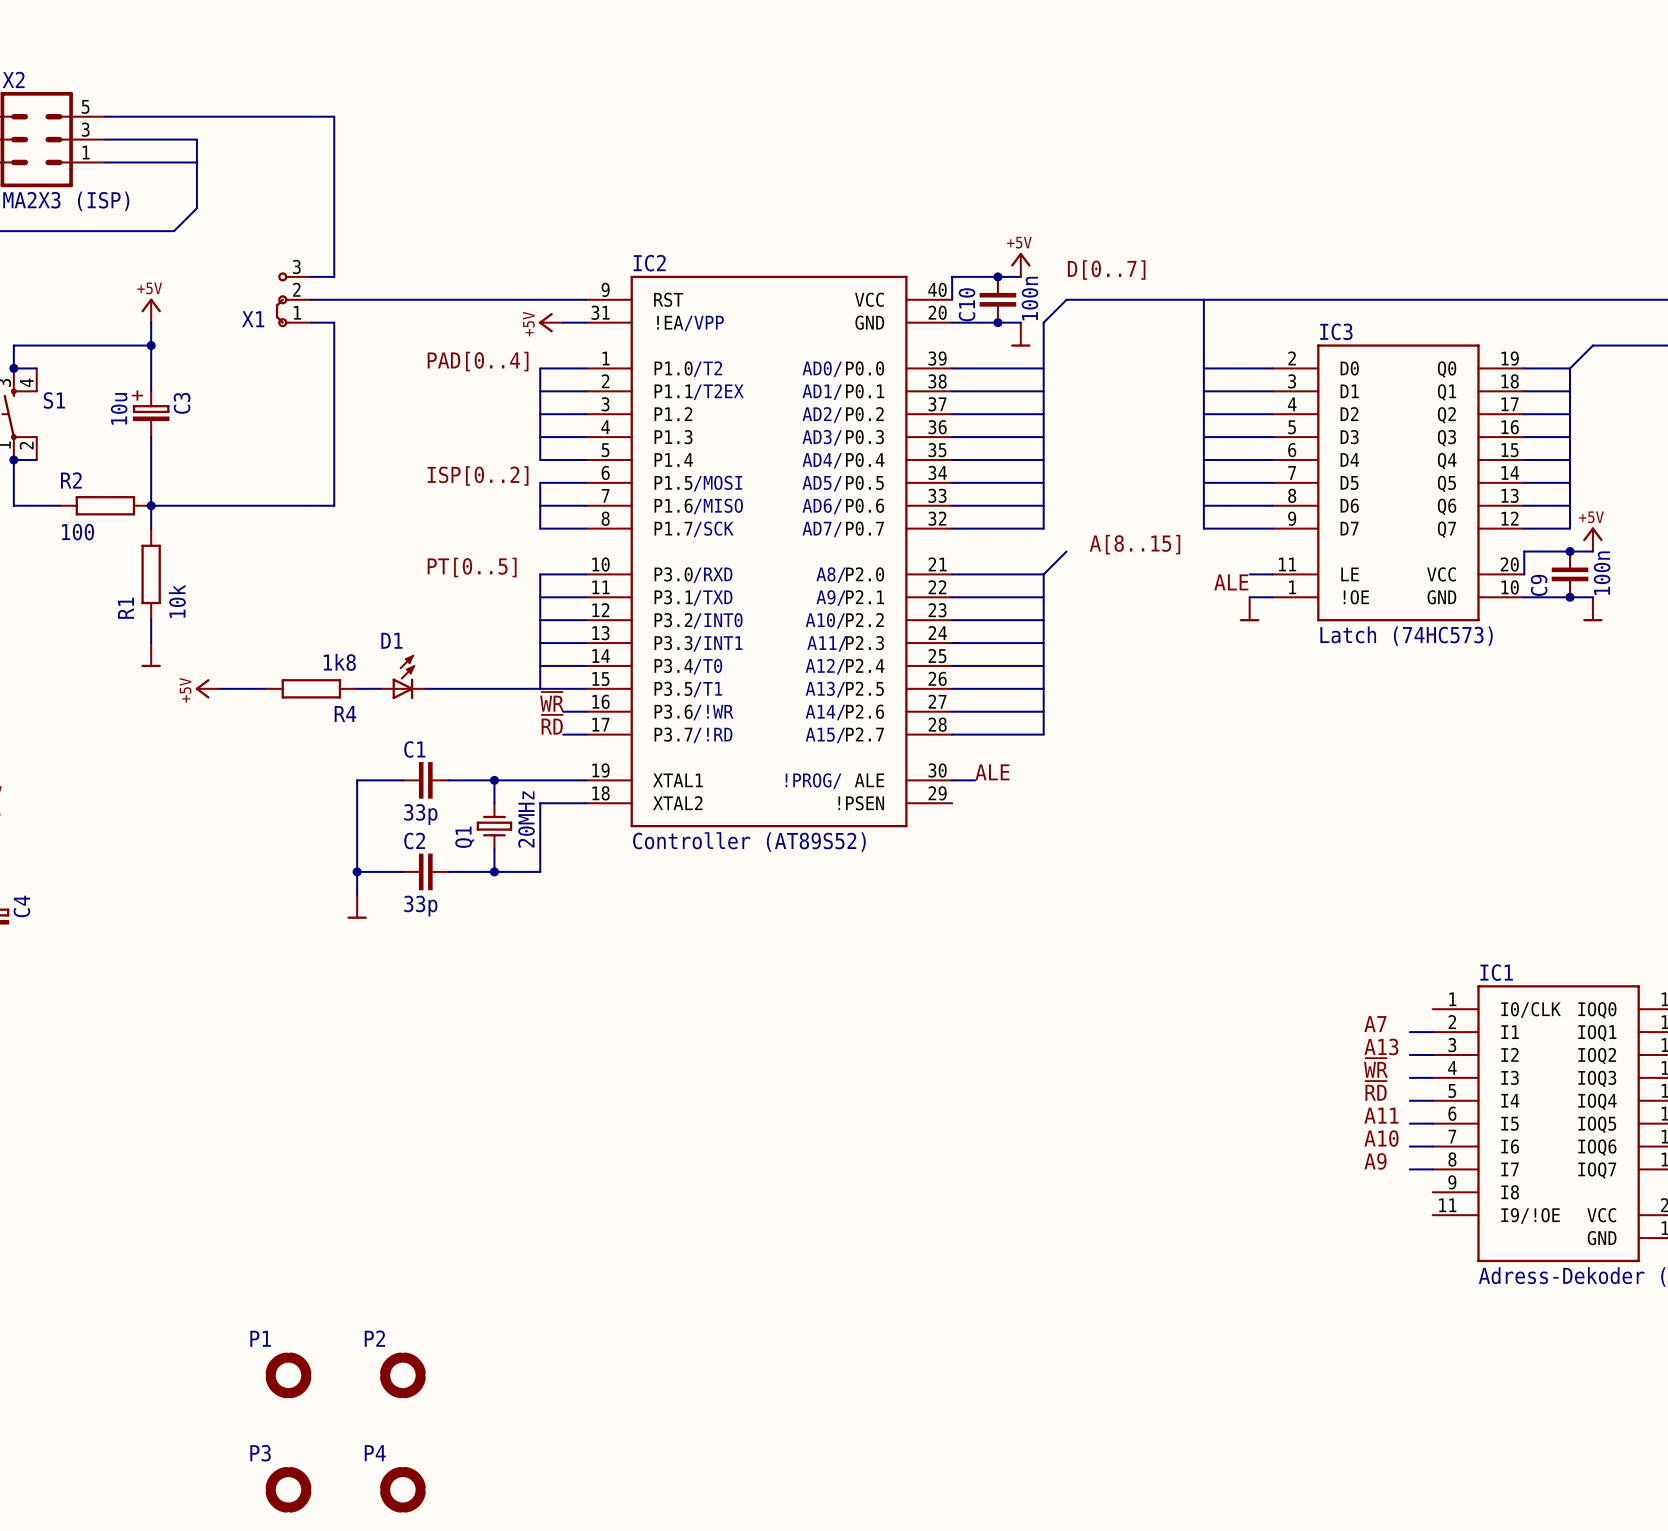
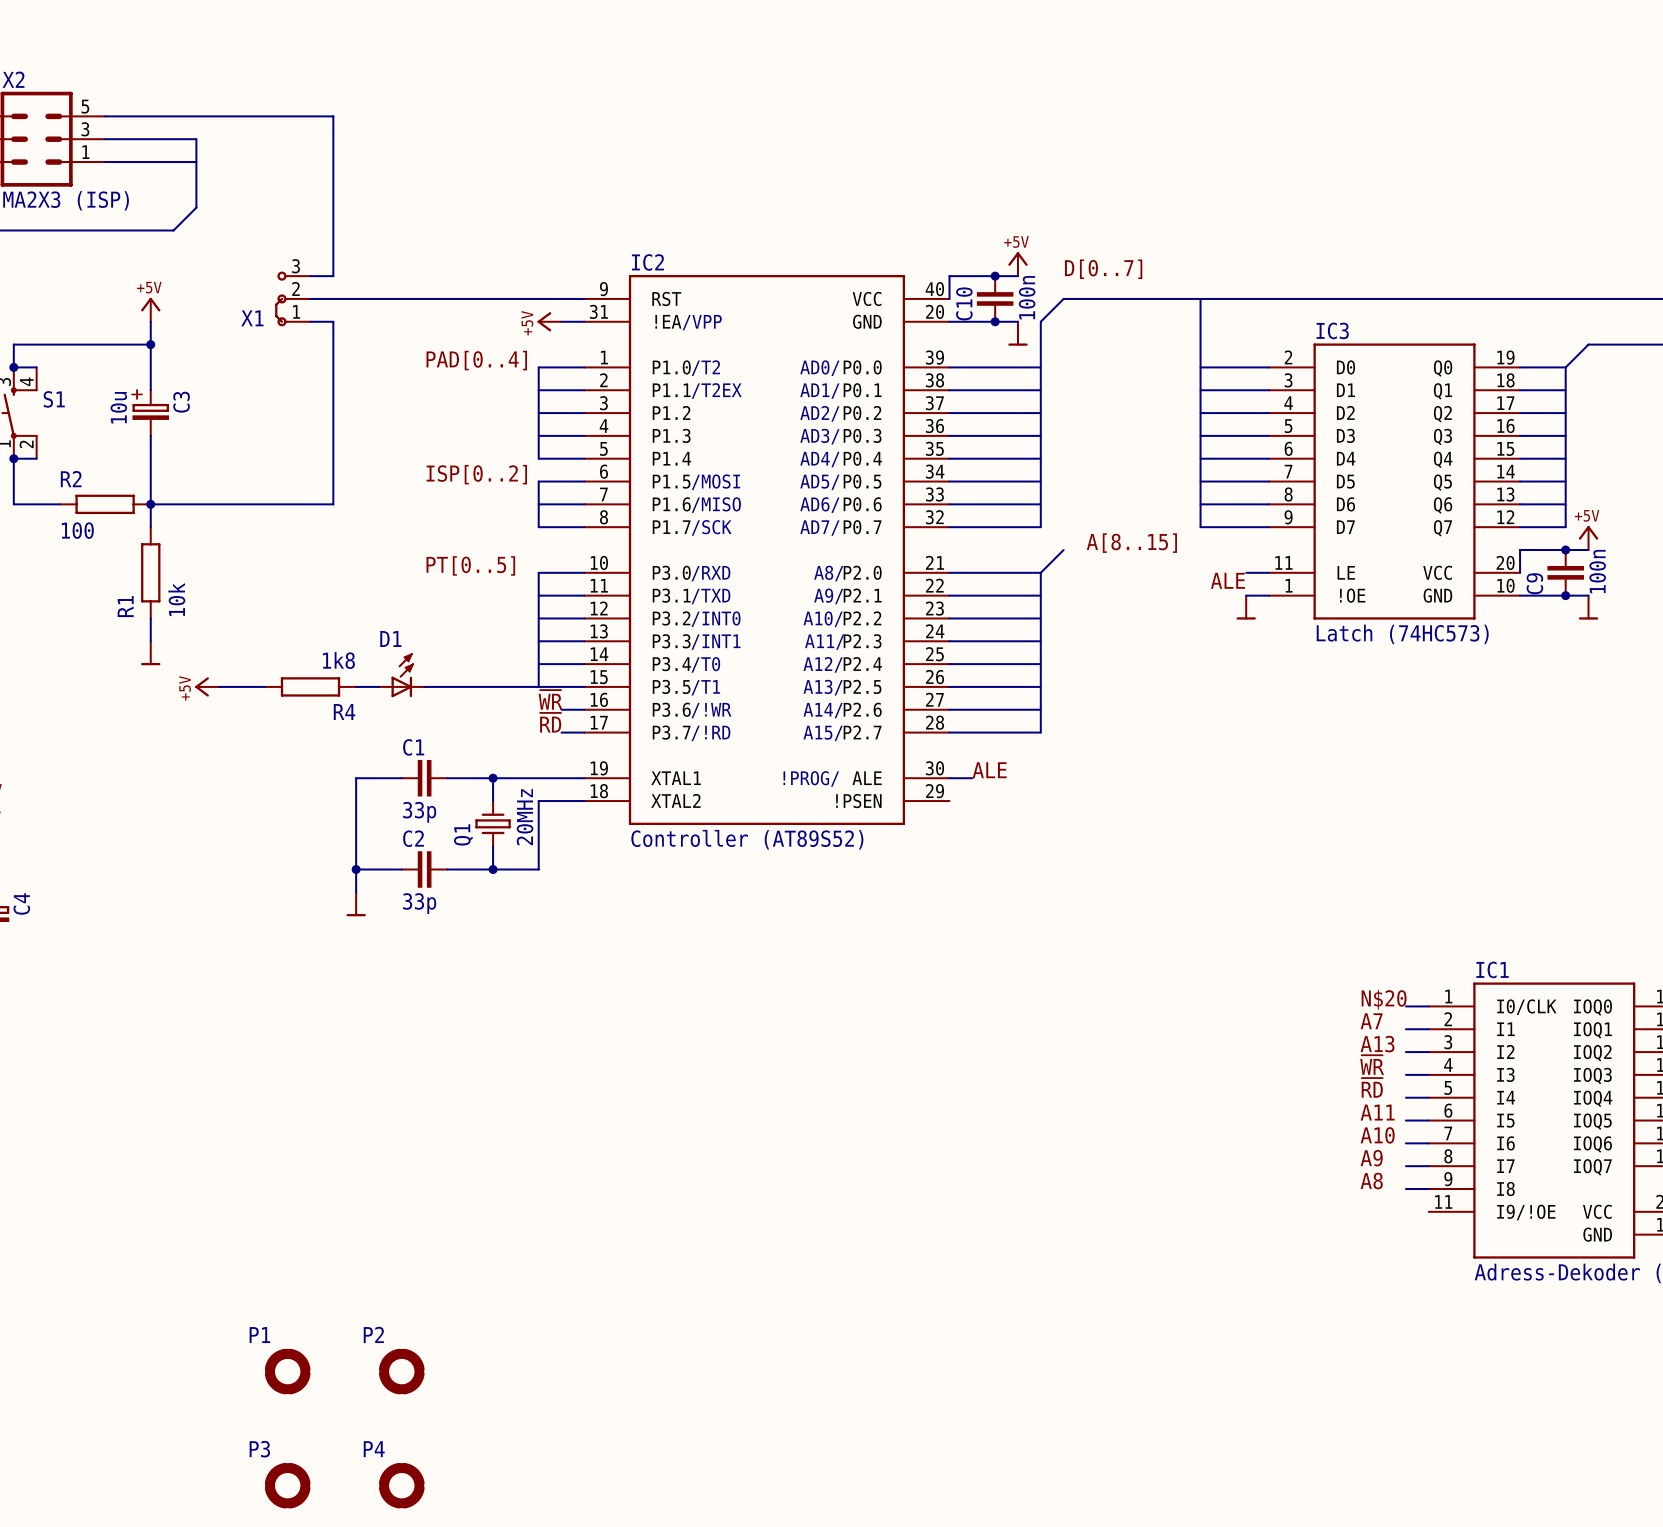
label: none -> N$20 (1384, 999)
wire: none -> (1405, 1006) (1428, 1006)
label: none -> A8 (1371, 1181)
wire: none -> (1405, 1189) (1428, 1189)

